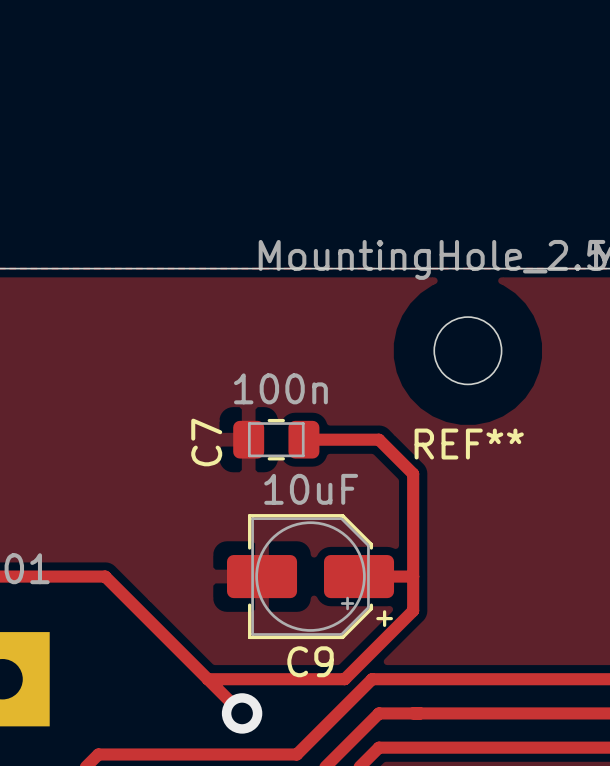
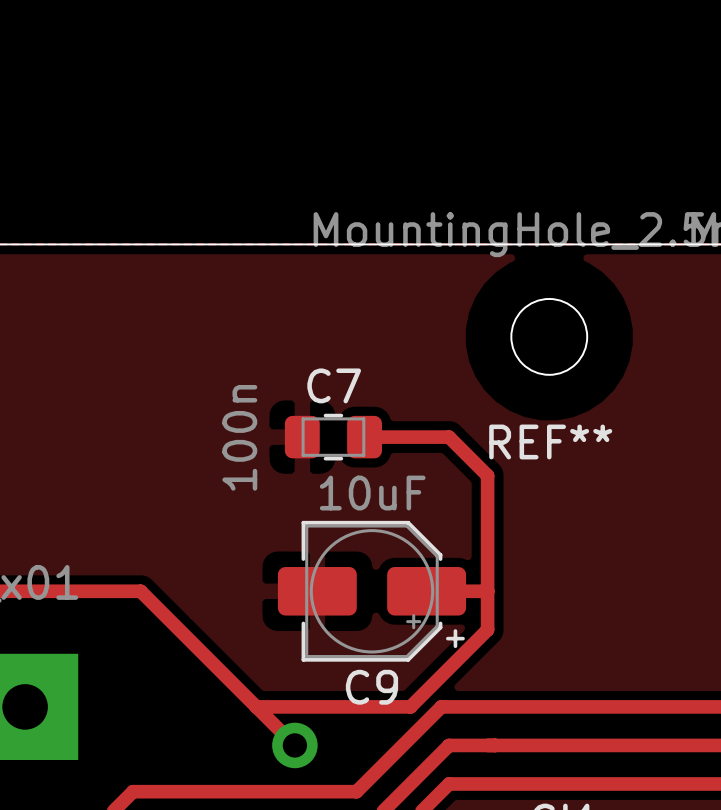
C7 value rotation: 0° (280, 388) -> 90° counterclockwise (239, 437)
C7 name rotation: 0° (206, 442) -> 90° clockwise (334, 385)
C7 name position: C7 (206, 442) -> C7 (334, 385)

